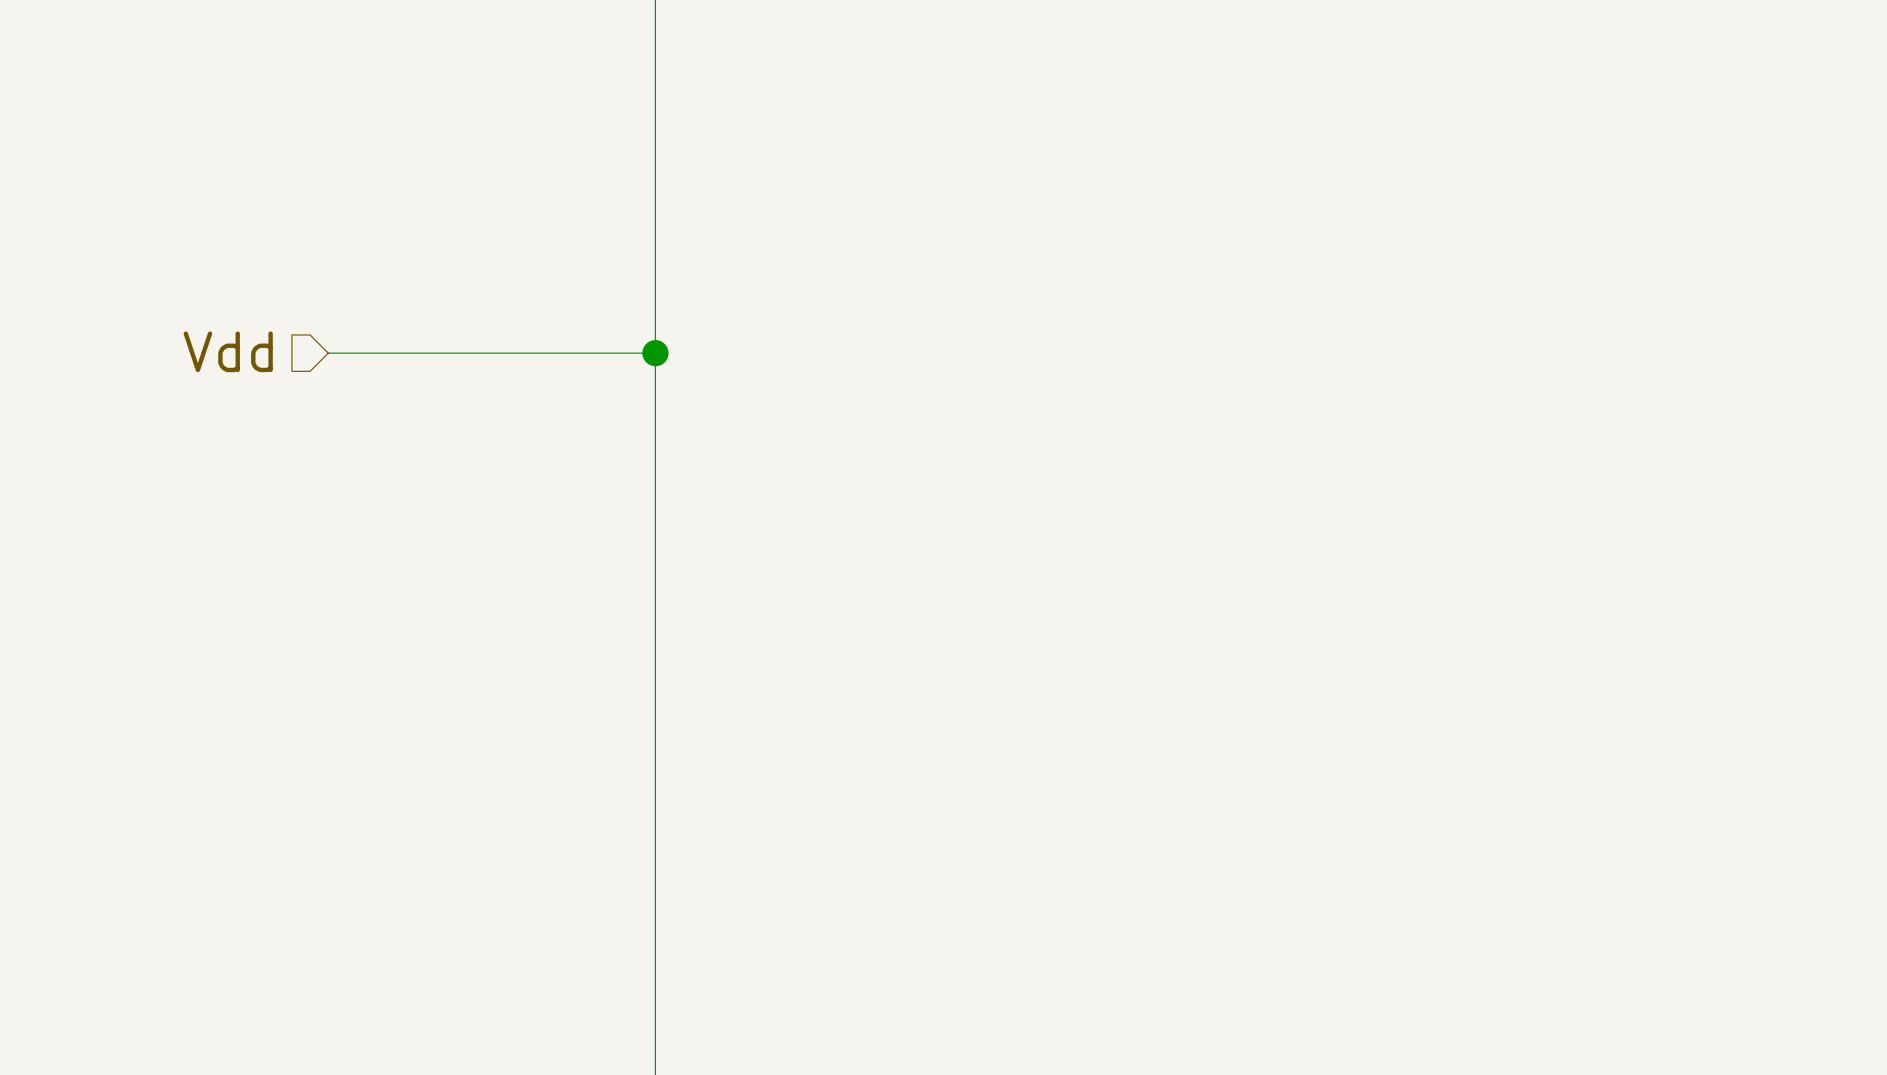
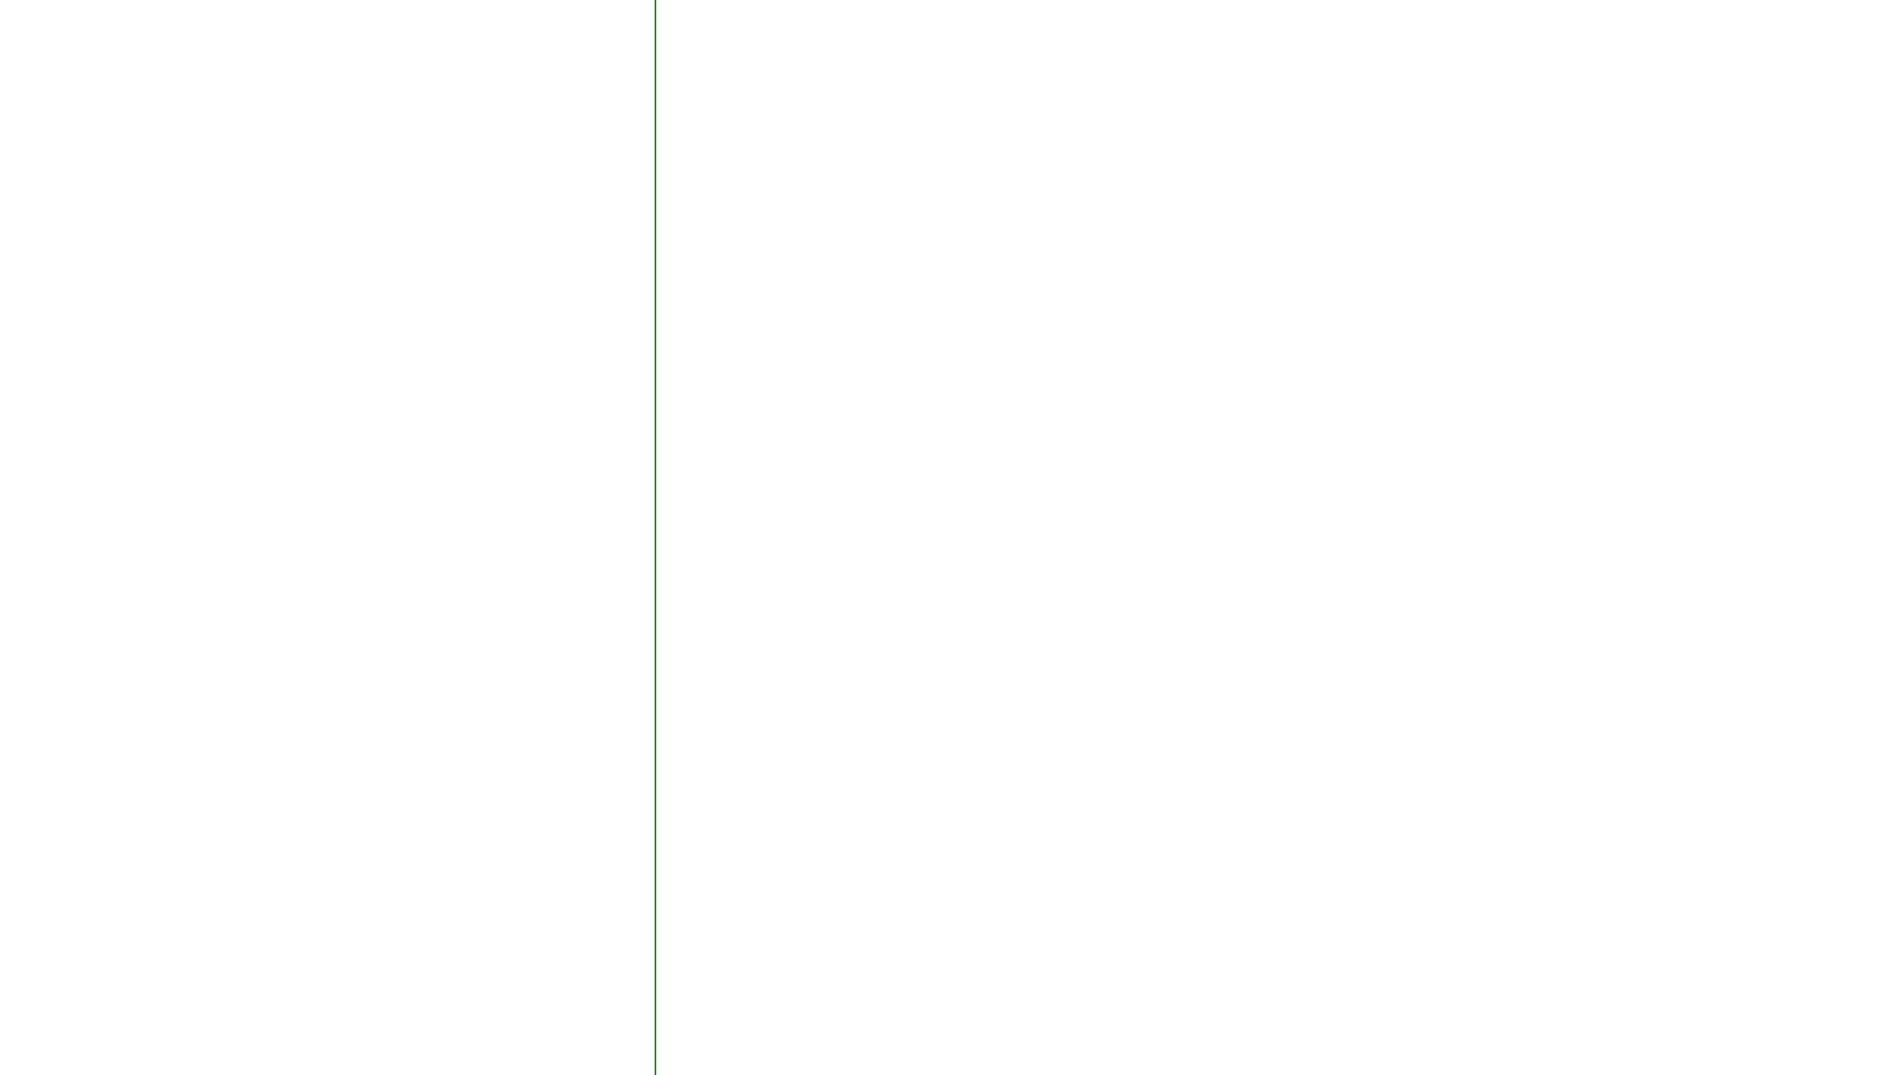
hierarchical label: Vdd (228, 351) -> none
wire: (328, 353) (655, 353) -> none
junction: (655, 353) -> none

